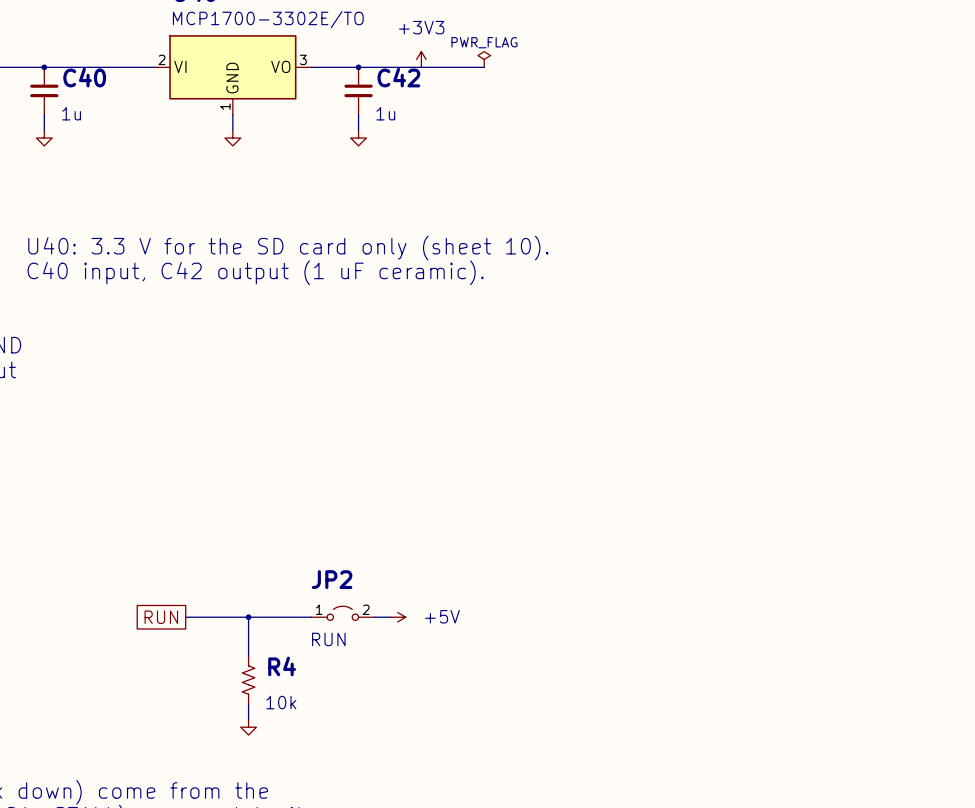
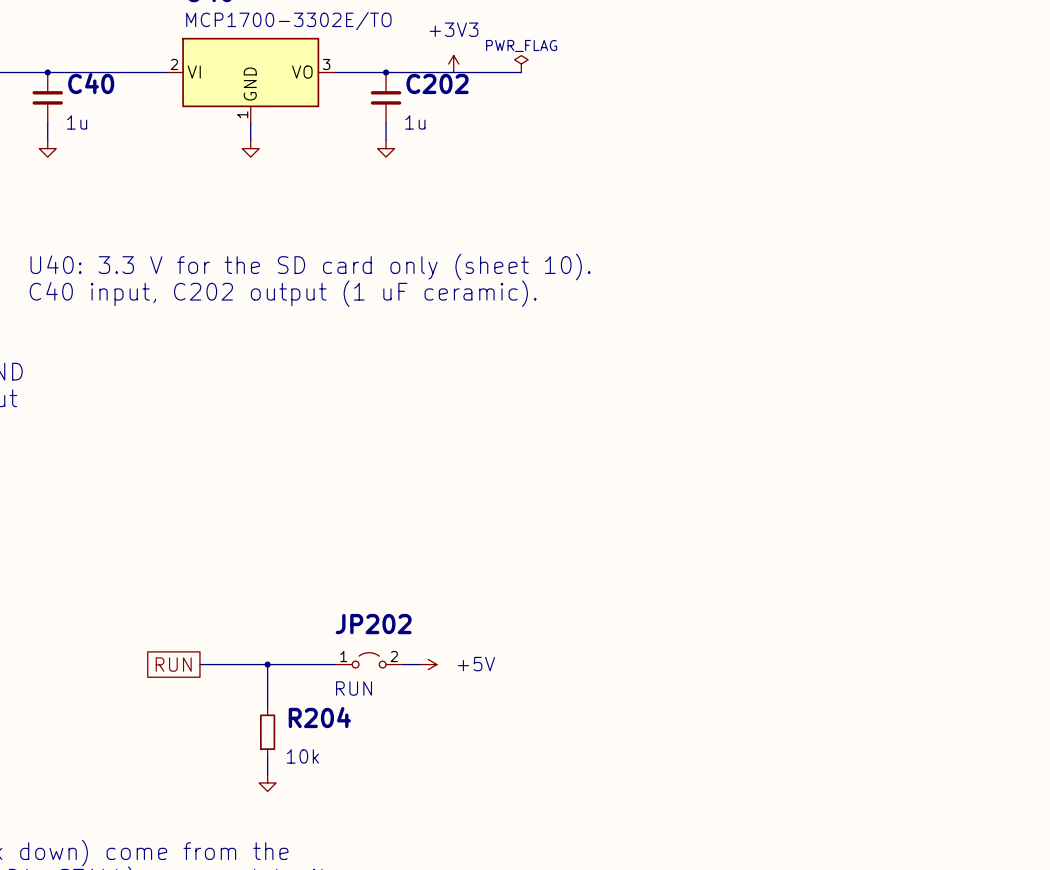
C42 name: C42 (398, 77) -> C202 (437, 83)
text: C40 input, C42 output (1 uF ceramic). (255, 272) -> C40 input, C202 output (1 uF ceramic). (283, 293)
JP2 name: JP2 (332, 579) -> JP202 (373, 624)
R4: 10k (248, 680) -> none
R204: none -> 10k (267, 732)

